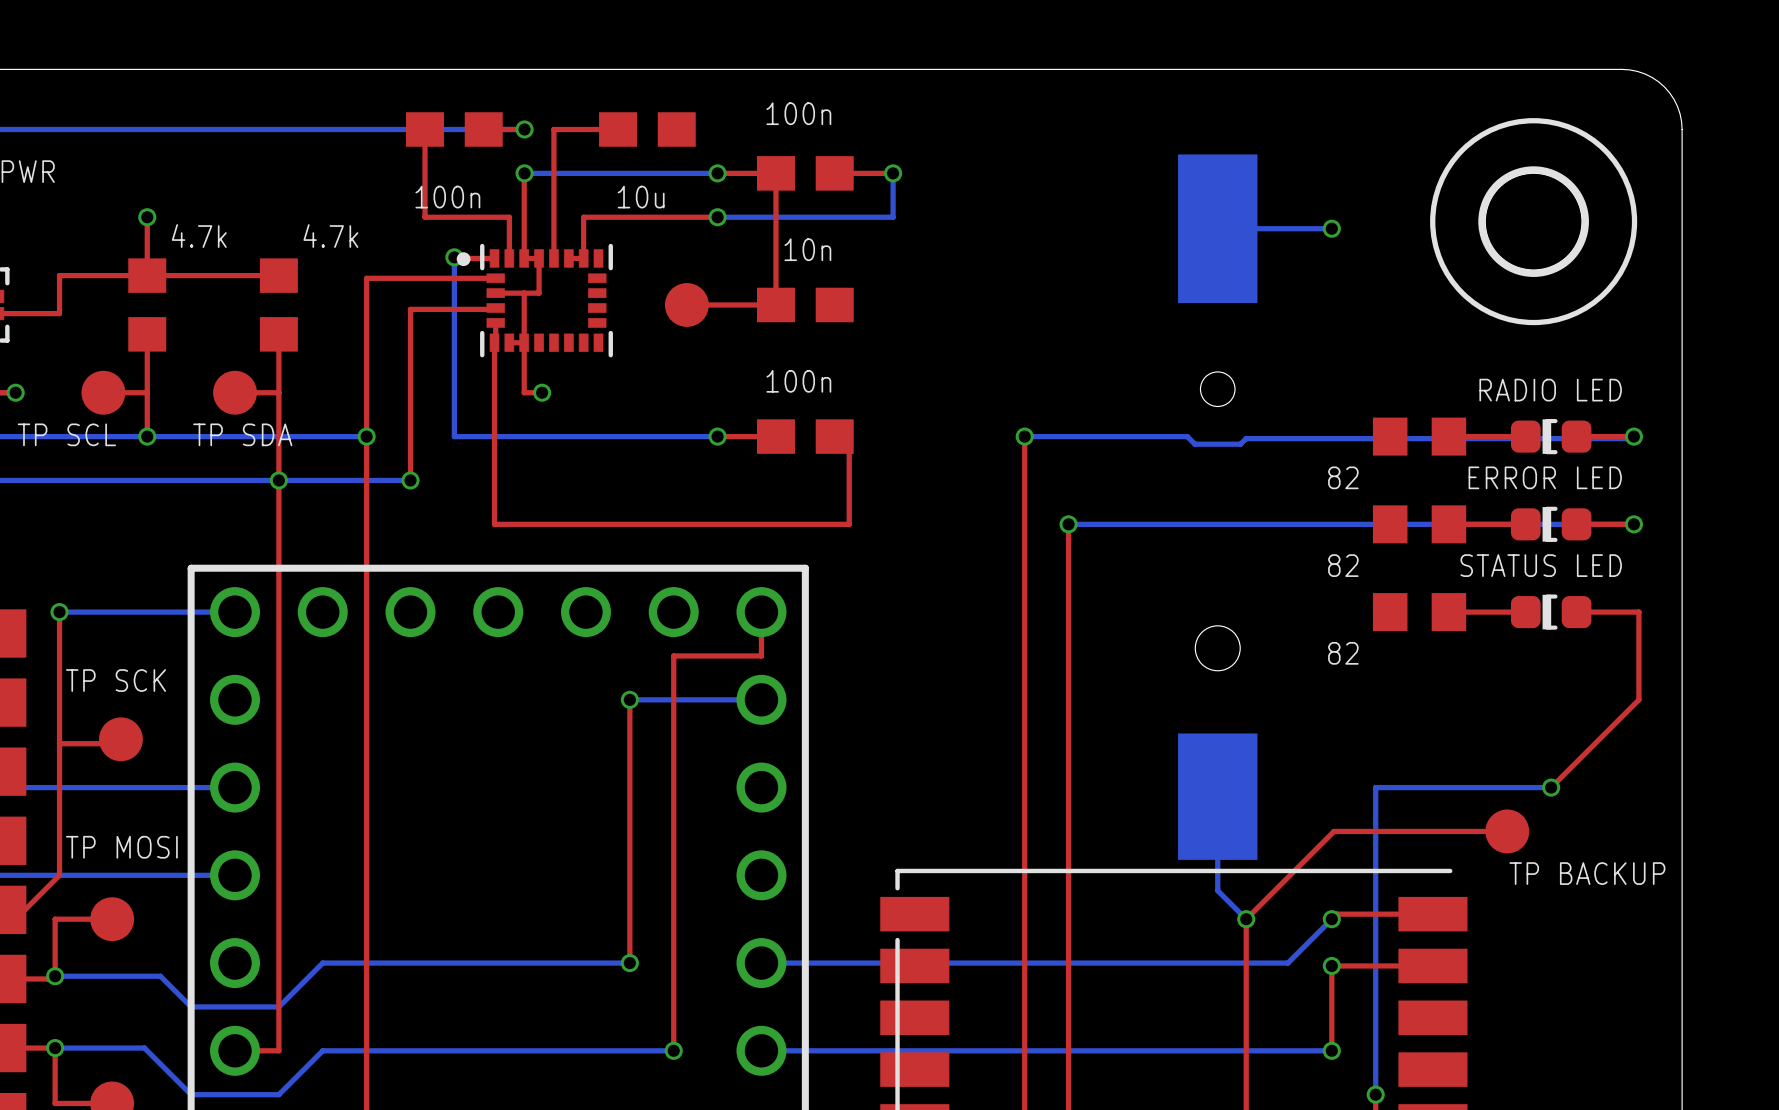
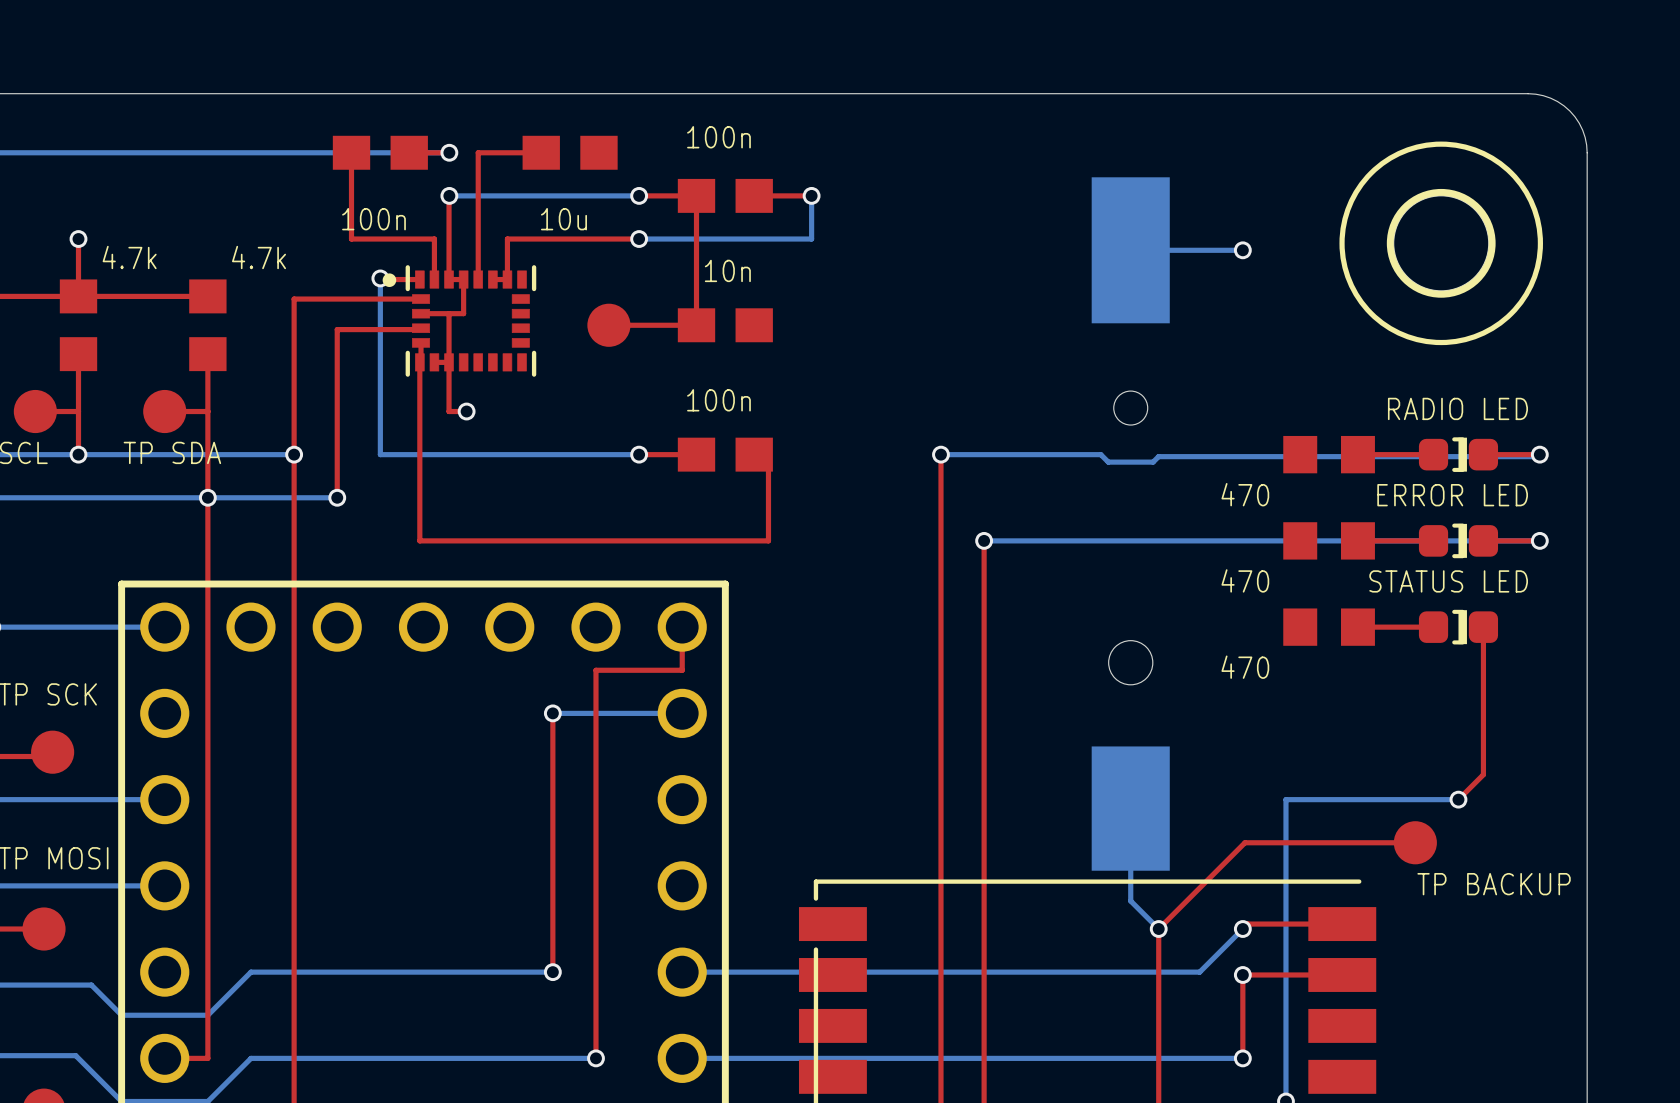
part rotation: 0° (1551, 436) -> 180° (1458, 454)
text: 82 (1343, 477) -> 470 (1245, 494)
part rotation: 0° (1551, 524) -> 180° (1458, 540)
text: 82 (1343, 565) -> 470 (1245, 580)
part rotation: 0° (1551, 612) -> 180° (1458, 627)
top track: (1576, 612) (1638, 612) (1638, 699) (1576, 762) -> (1483, 627) (1483, 774)
text: 82 (1343, 653) -> 470 (1245, 667)

